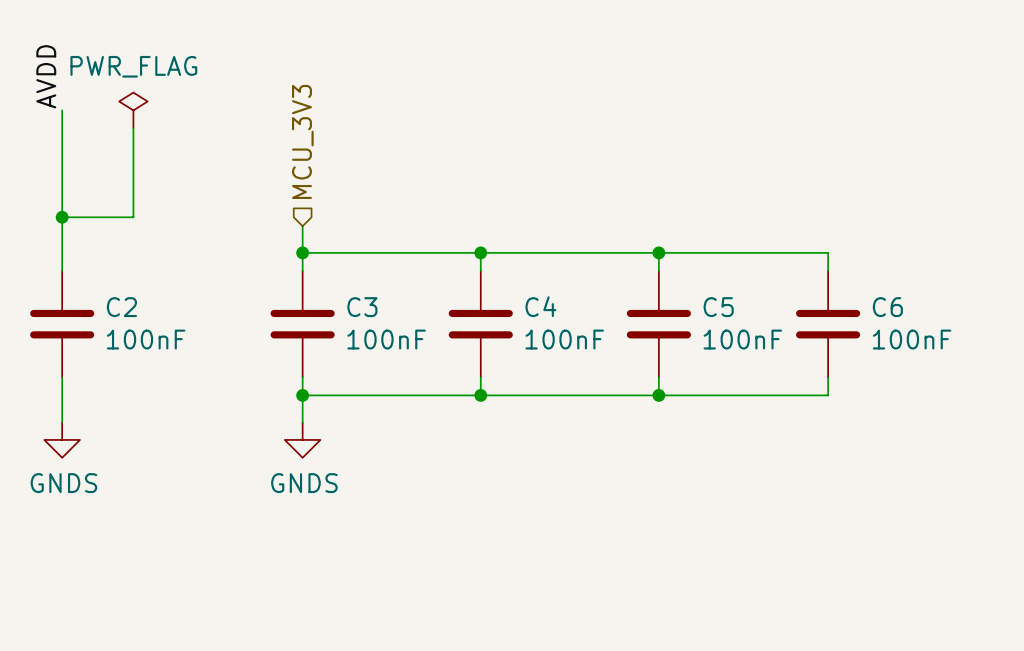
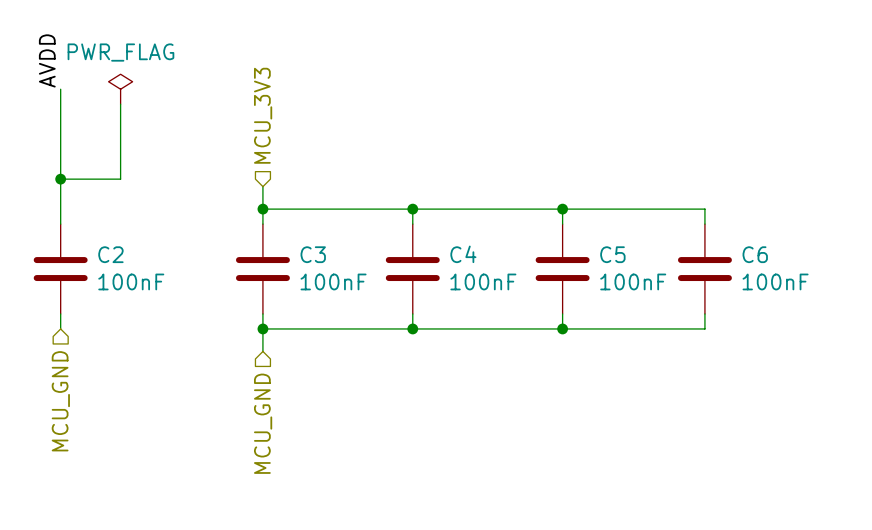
wire: (62, 395) (62, 422) -> none
power symbol: GNDS (62, 439) -> none
power symbol: GNDS (302, 439) -> none
hierarchical label: none -> MCU_GND (60, 401)
hierarchical label: none -> MCU_GND (263, 423)

